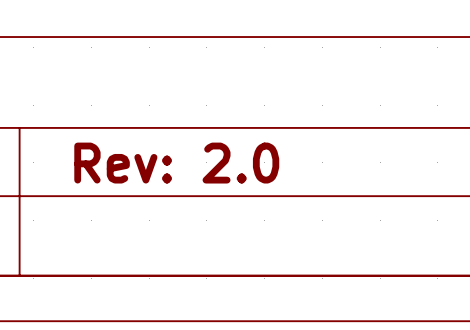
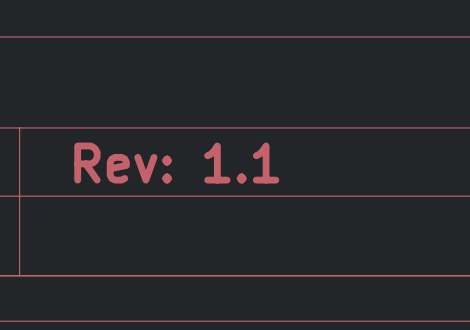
title block: Rev: 2.0 (176, 163) -> Rev: 1.1 (176, 163)

